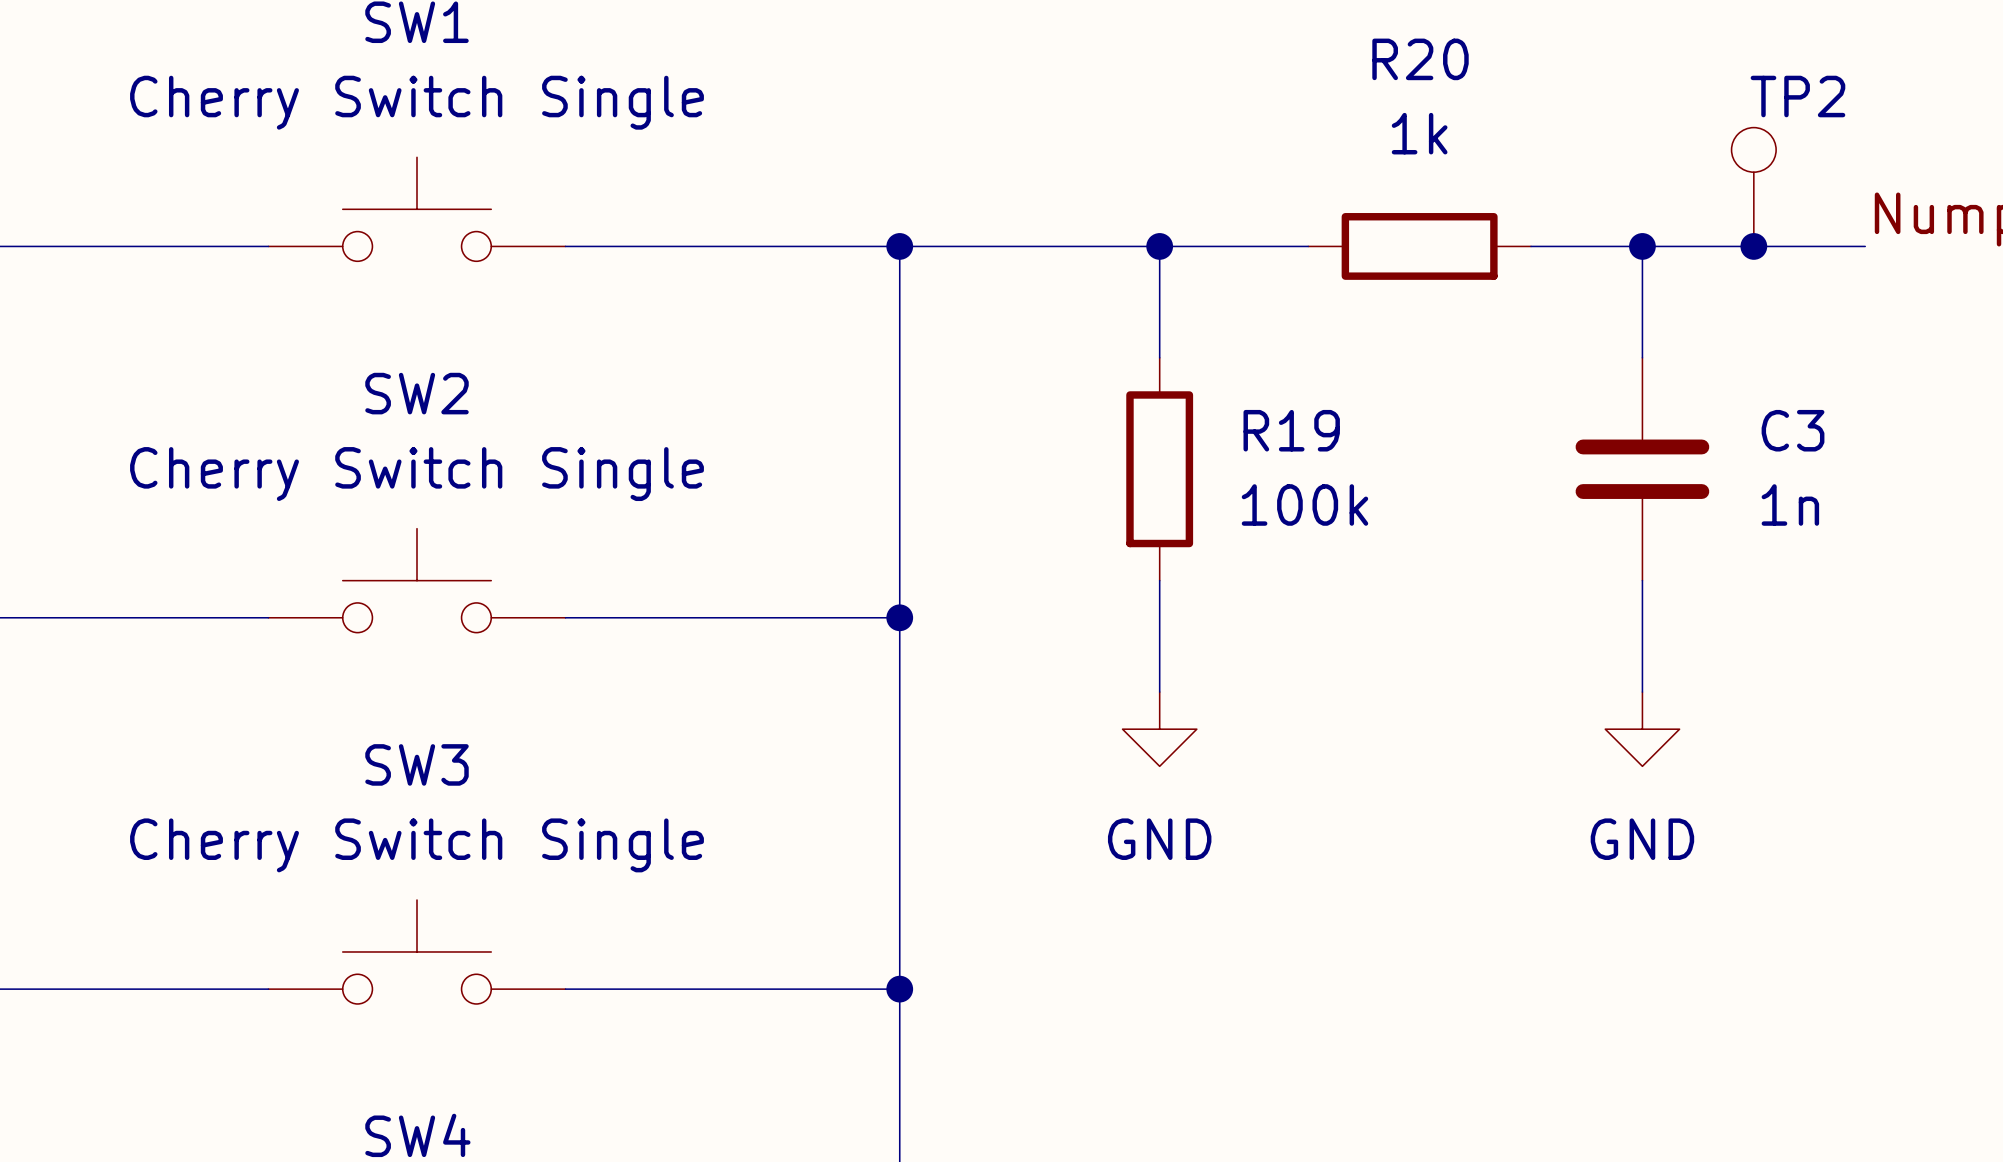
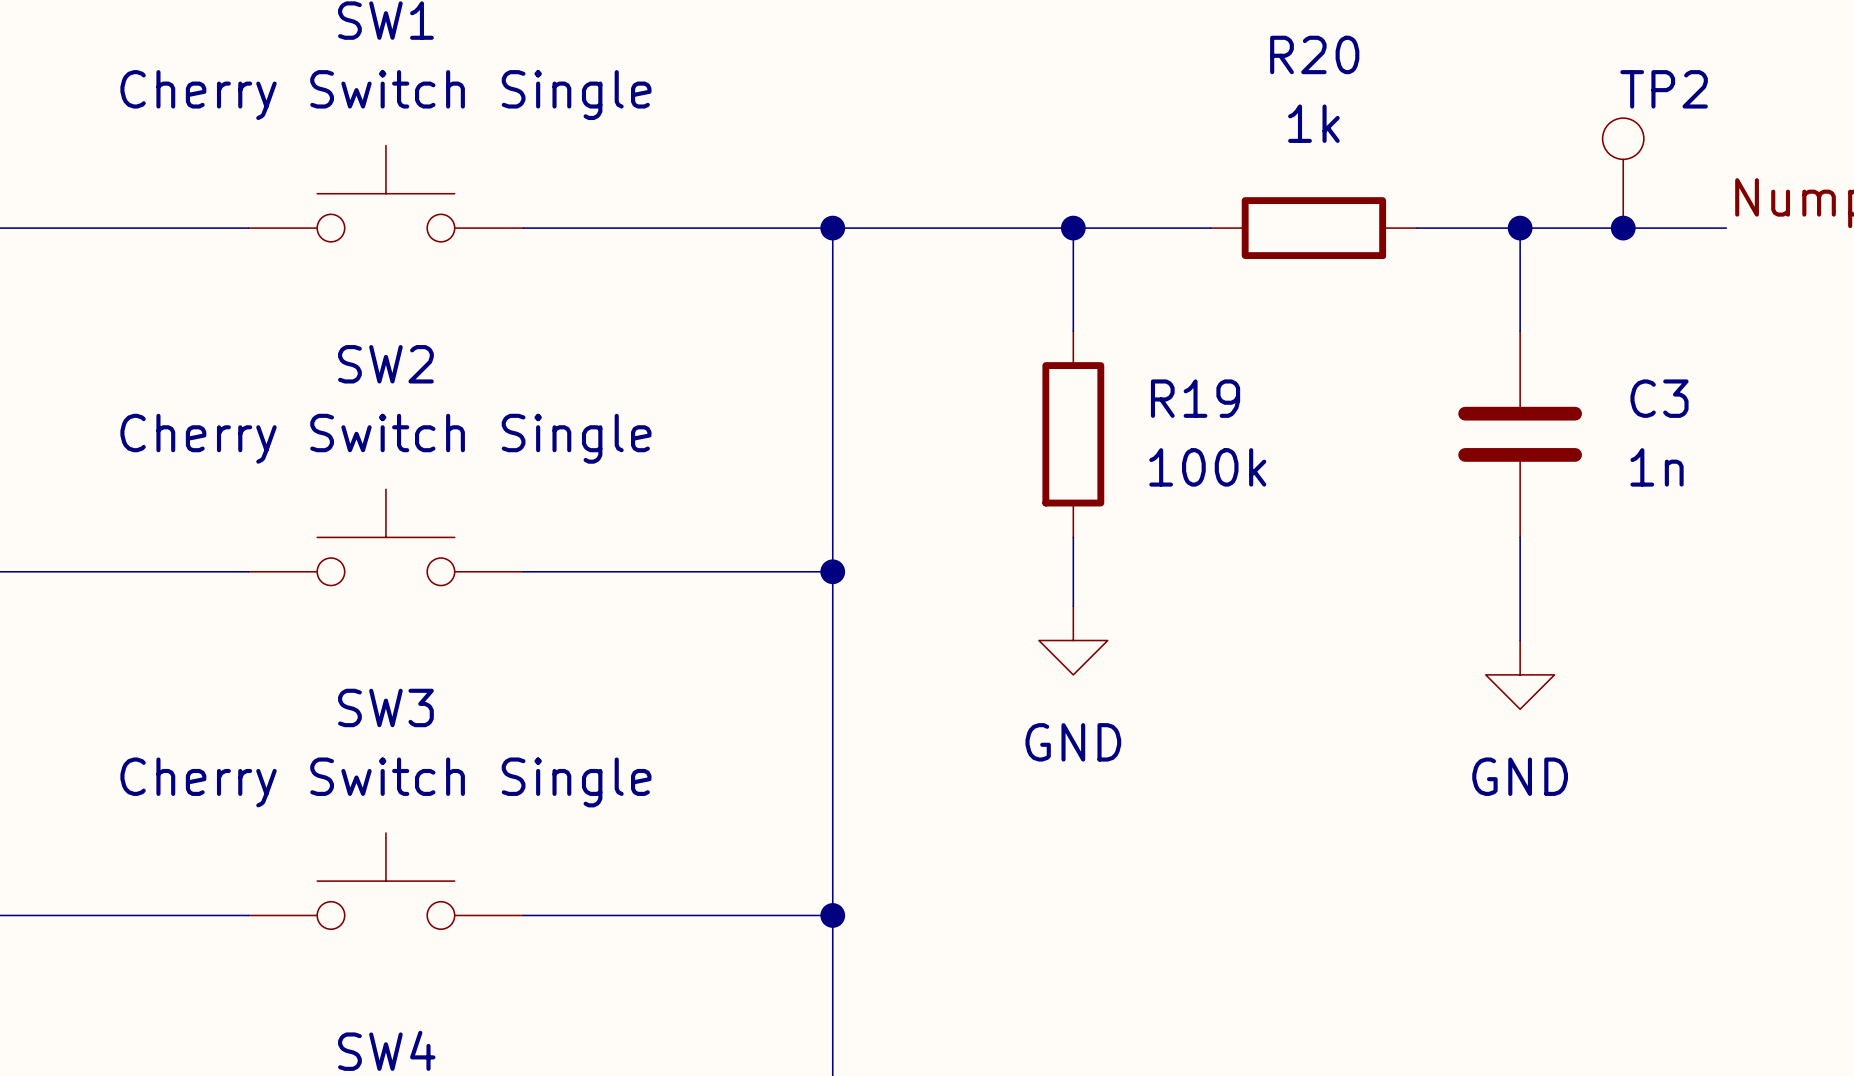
power symbol position: GND (1159, 729) -> GND (1073, 640)

